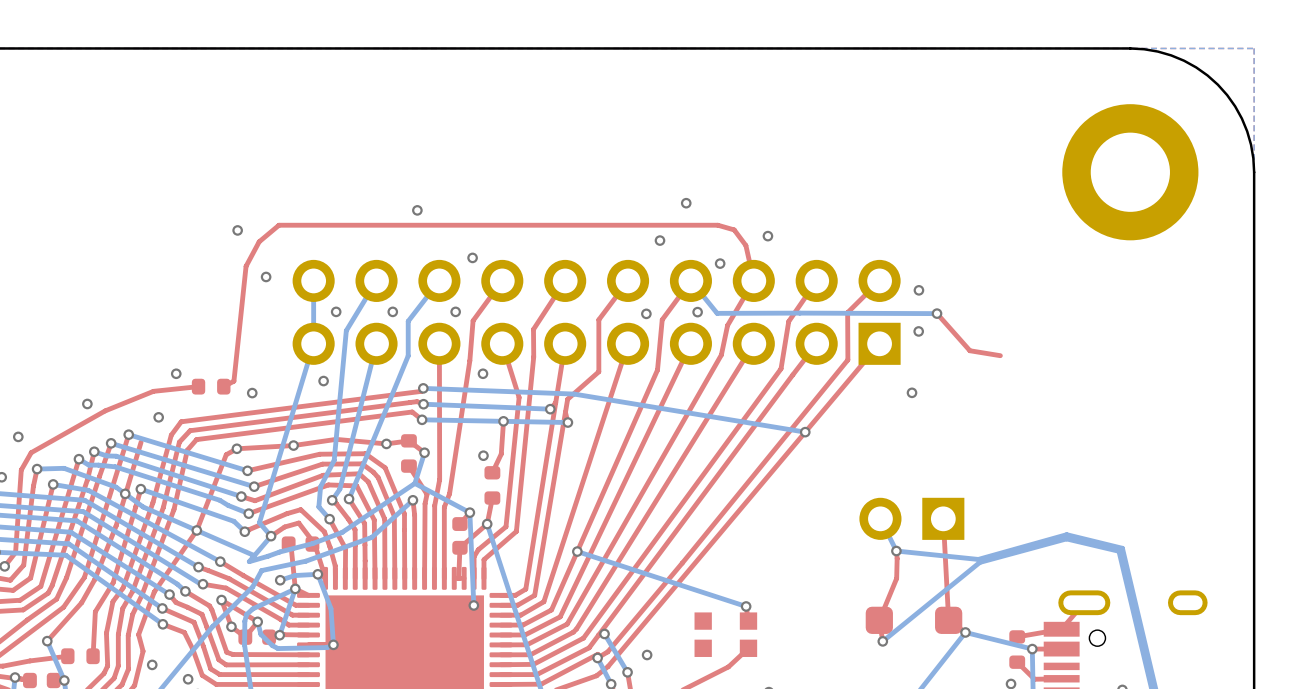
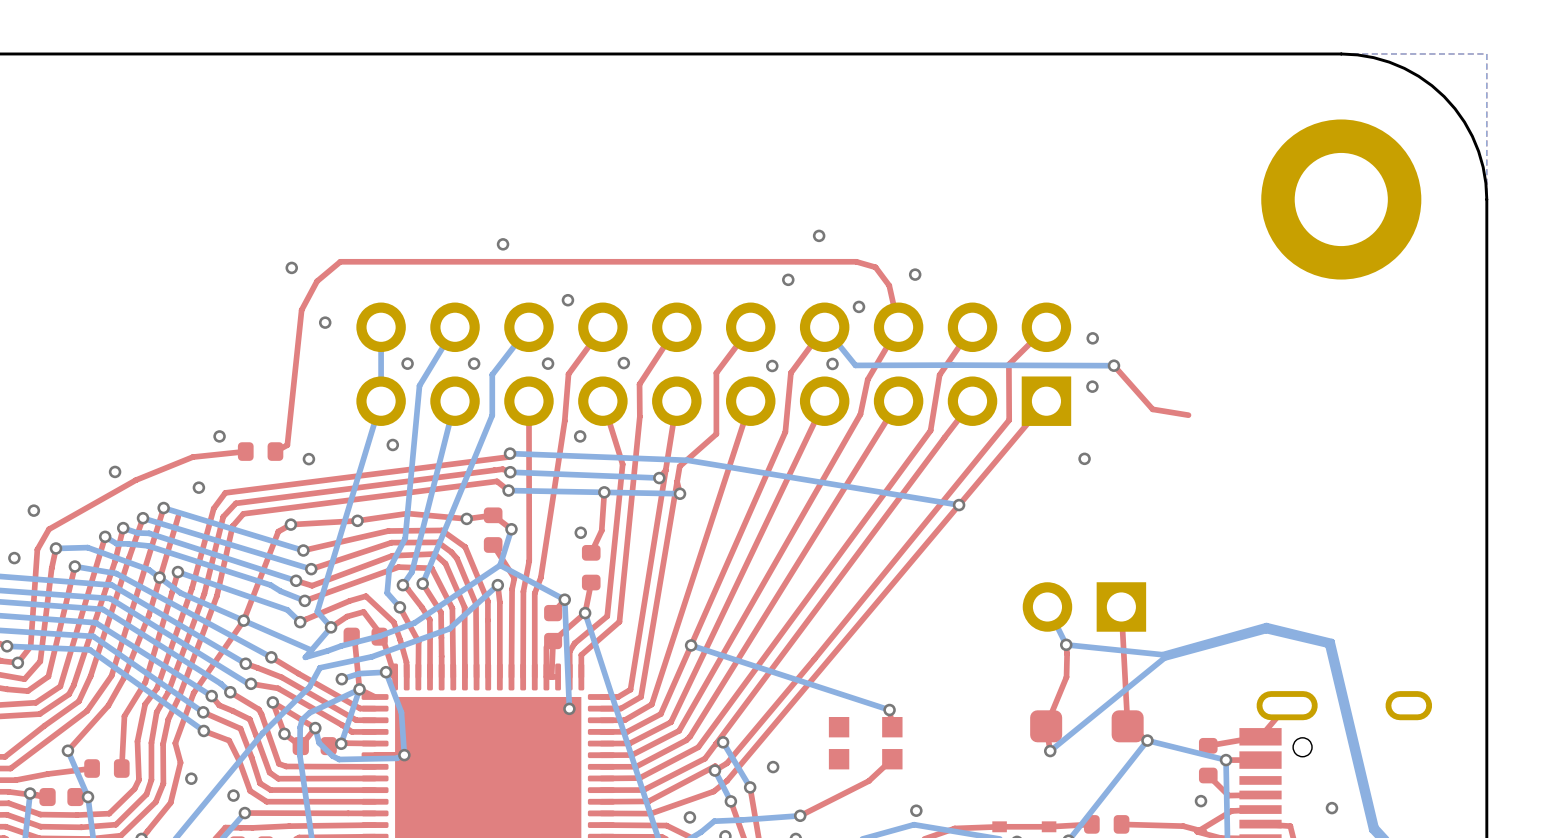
via: none -> (623, 363)
top track: none -> (546, 647) (546, 676)

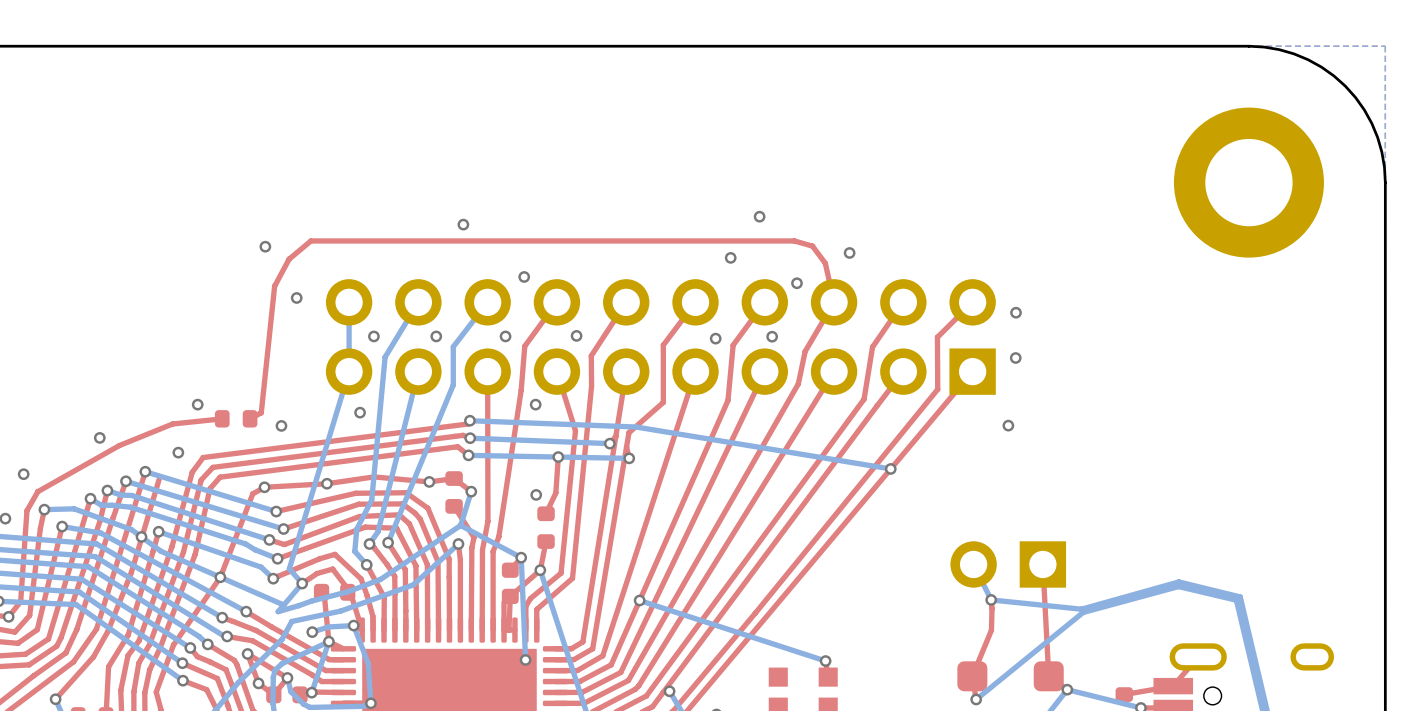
bottom track: (824, 327) (855, 365) (1113, 365) -> none
top track: (1113, 365) (1152, 409) (1188, 415) -> none
via: (1113, 365) -> none

